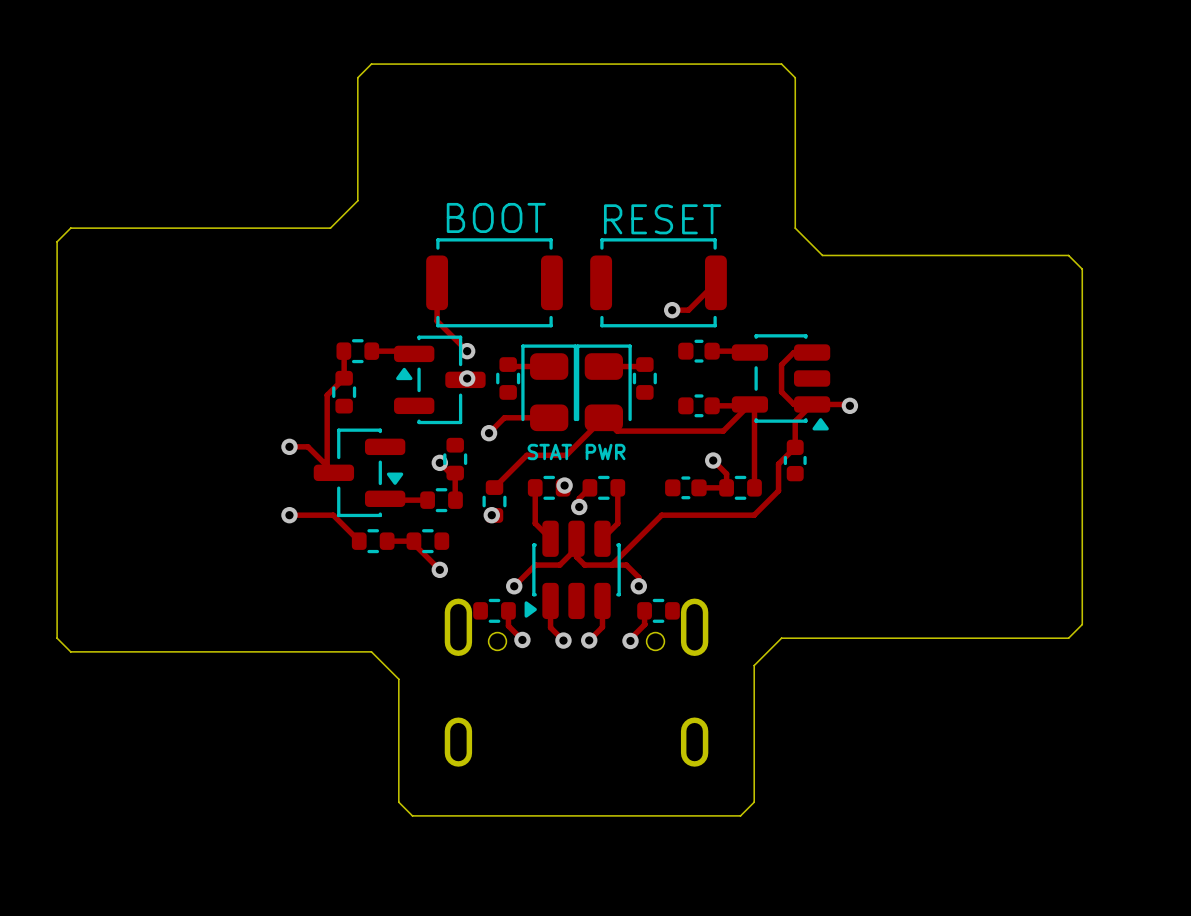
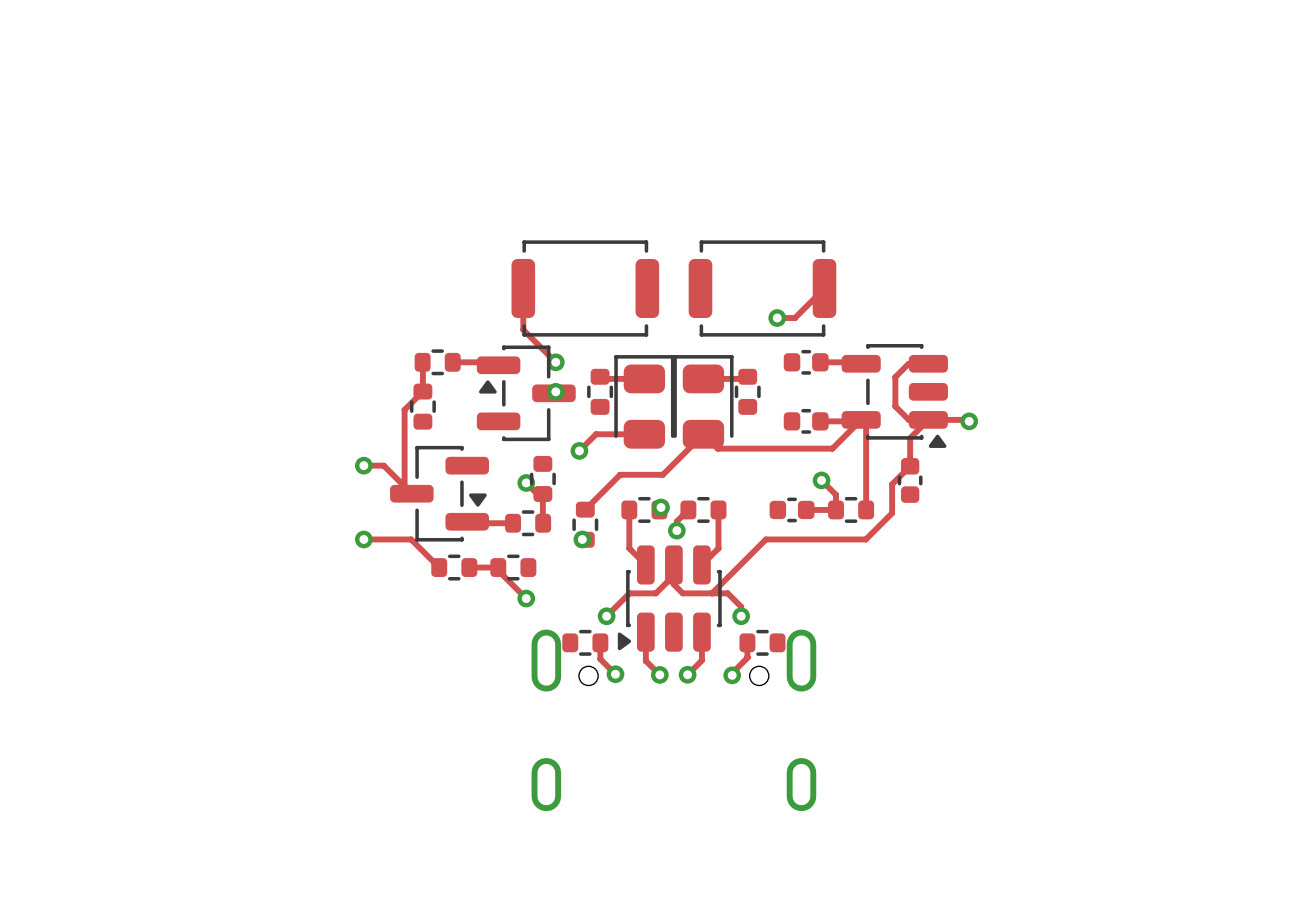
board edge: (371, 64) (357, 77) (357, 200) (330, 228) (70, 228) (57, 241) (57, 638) (70, 651) (371, 651) (398, 679) (398, 802) (412, 815) (740, 815) (754, 802) (754, 665) (781, 638) (1068, 638) (1082, 624) (1082, 269) (1068, 255) (822, 255) (795, 228) (795, 77) (781, 64) (371, 64) -> none
text: BOOT (496, 217) -> none
text: RESET (662, 219) -> none
text: STAT (549, 452) -> none
text: PWR (605, 452) -> none

